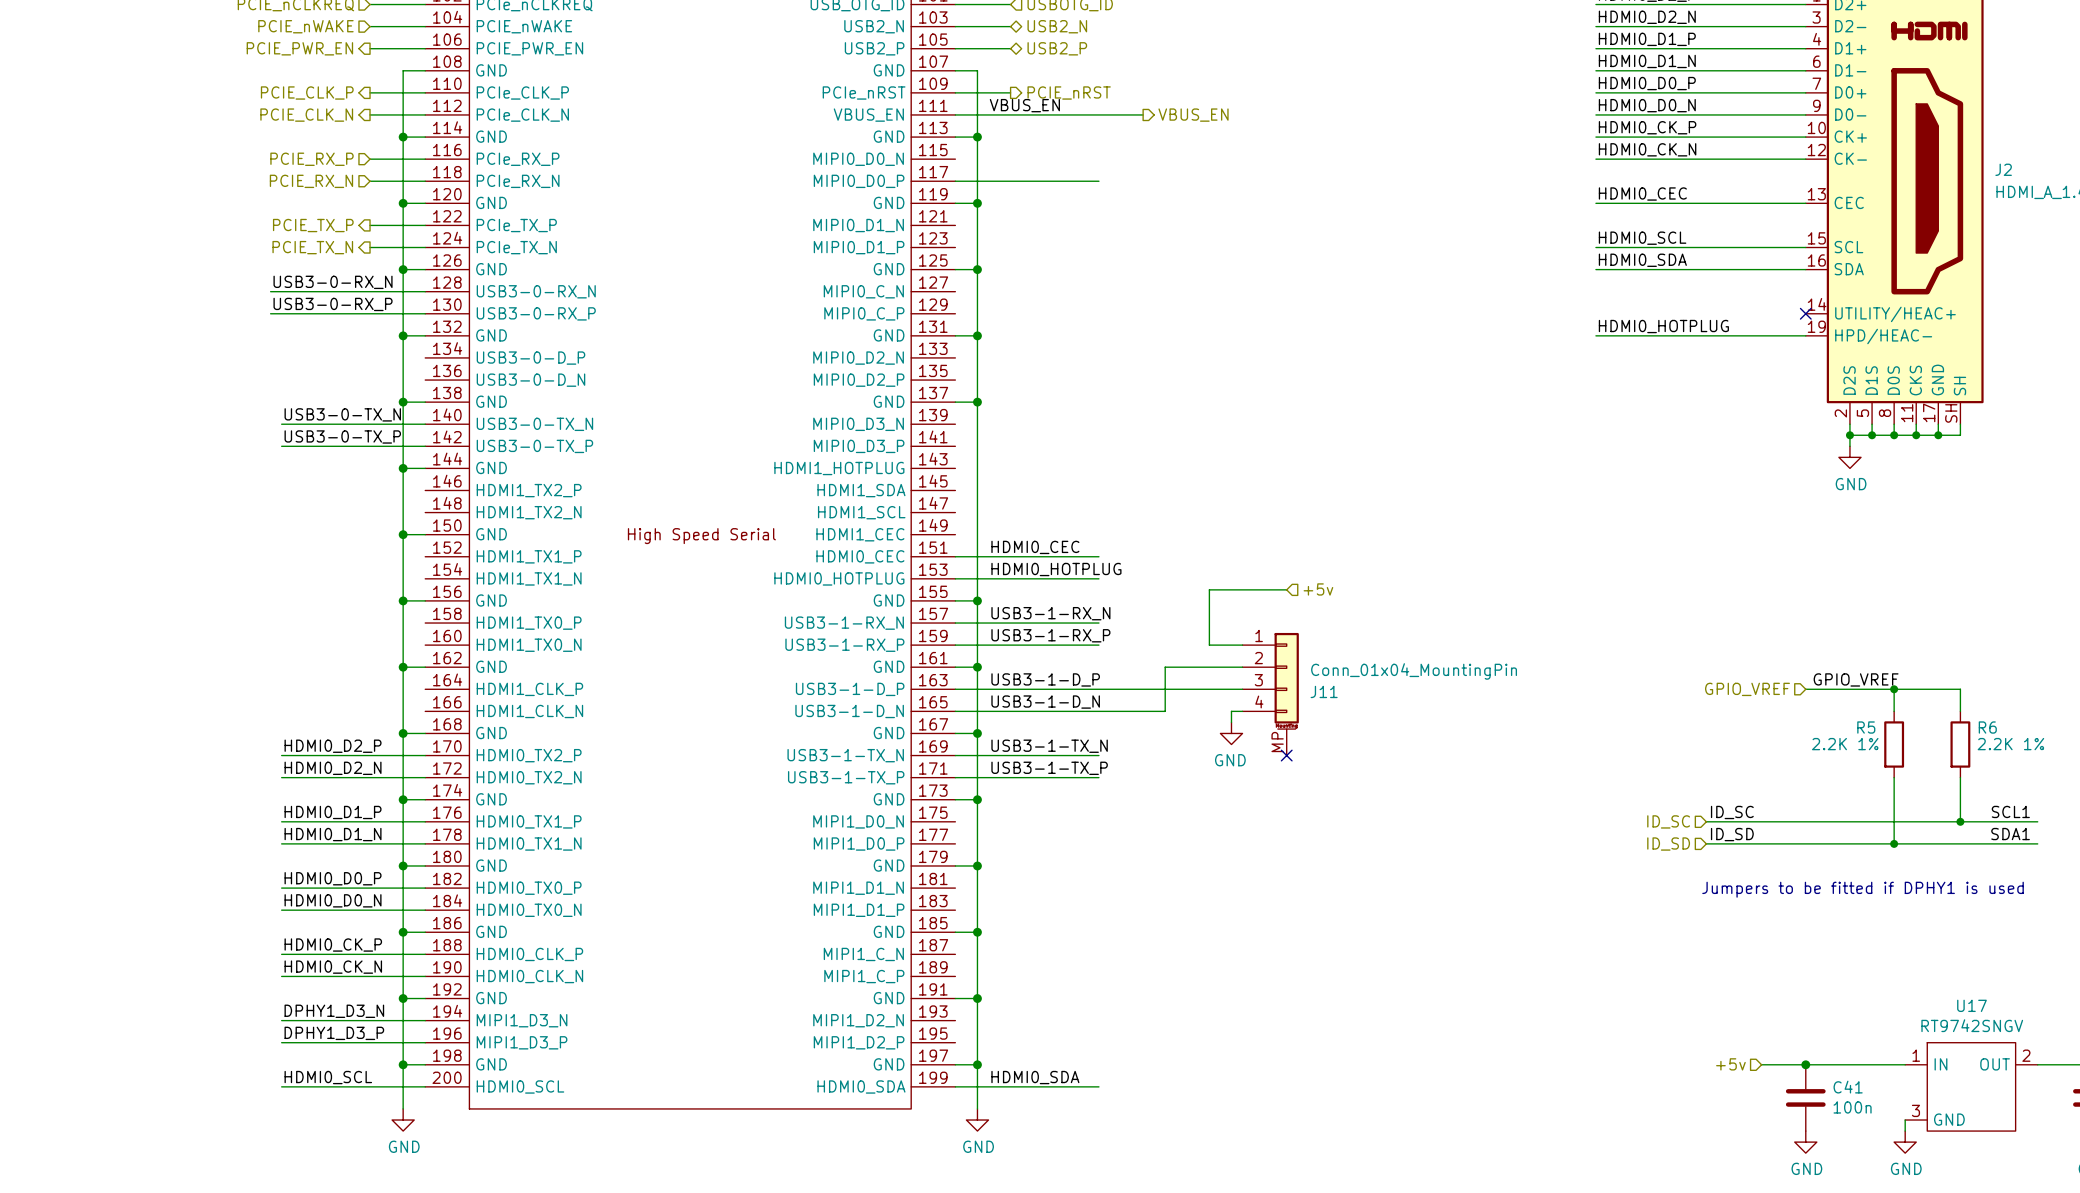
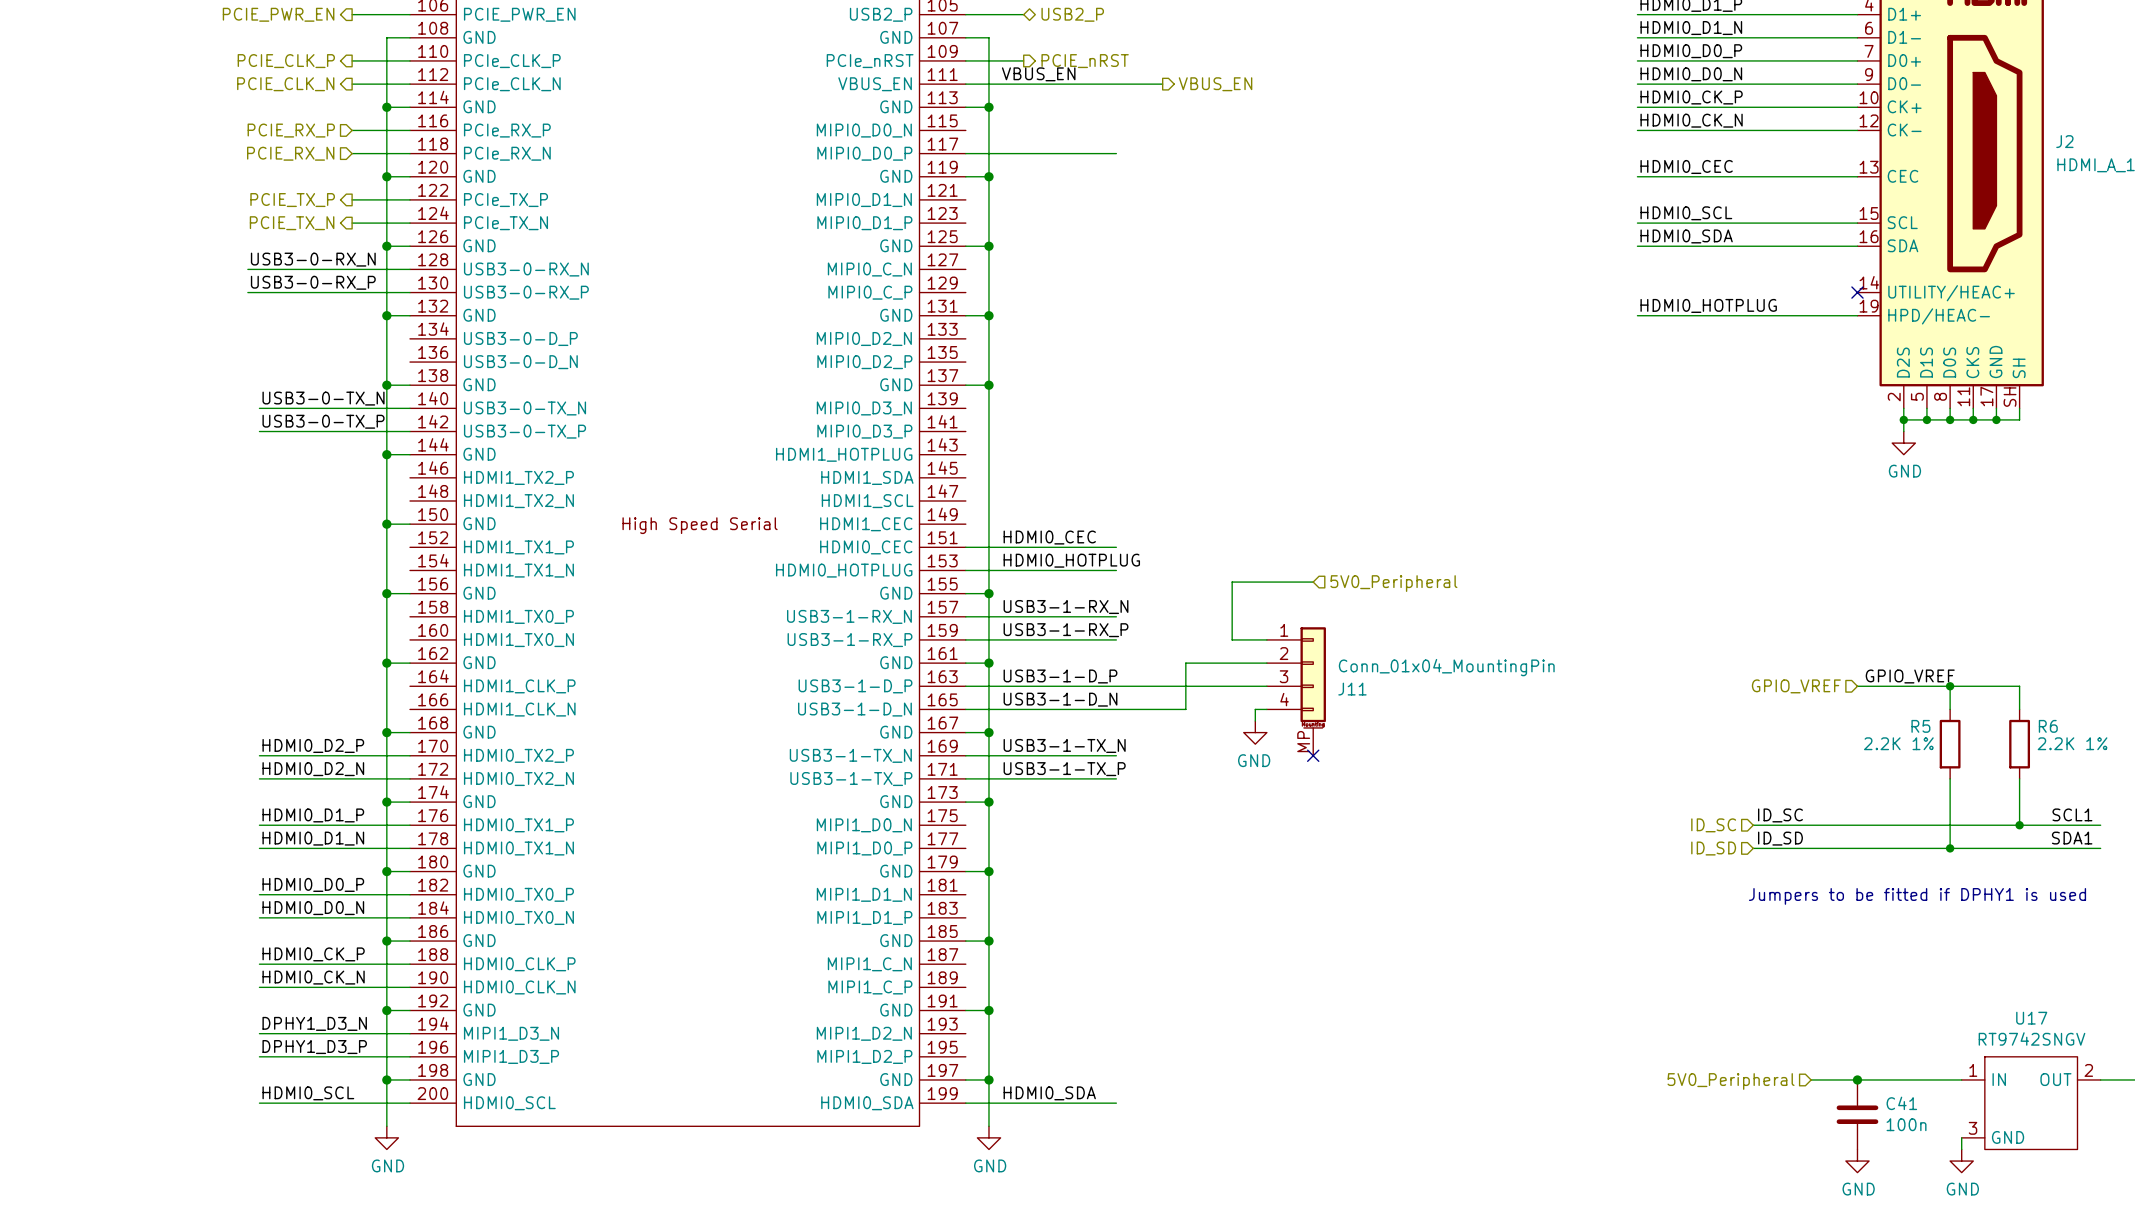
hierarchical label: +5v (1318, 589) -> 5V0_Peripheral (1393, 583)
hierarchical label: +5v (1730, 1064) -> 5V0_Peripheral (1731, 1081)

